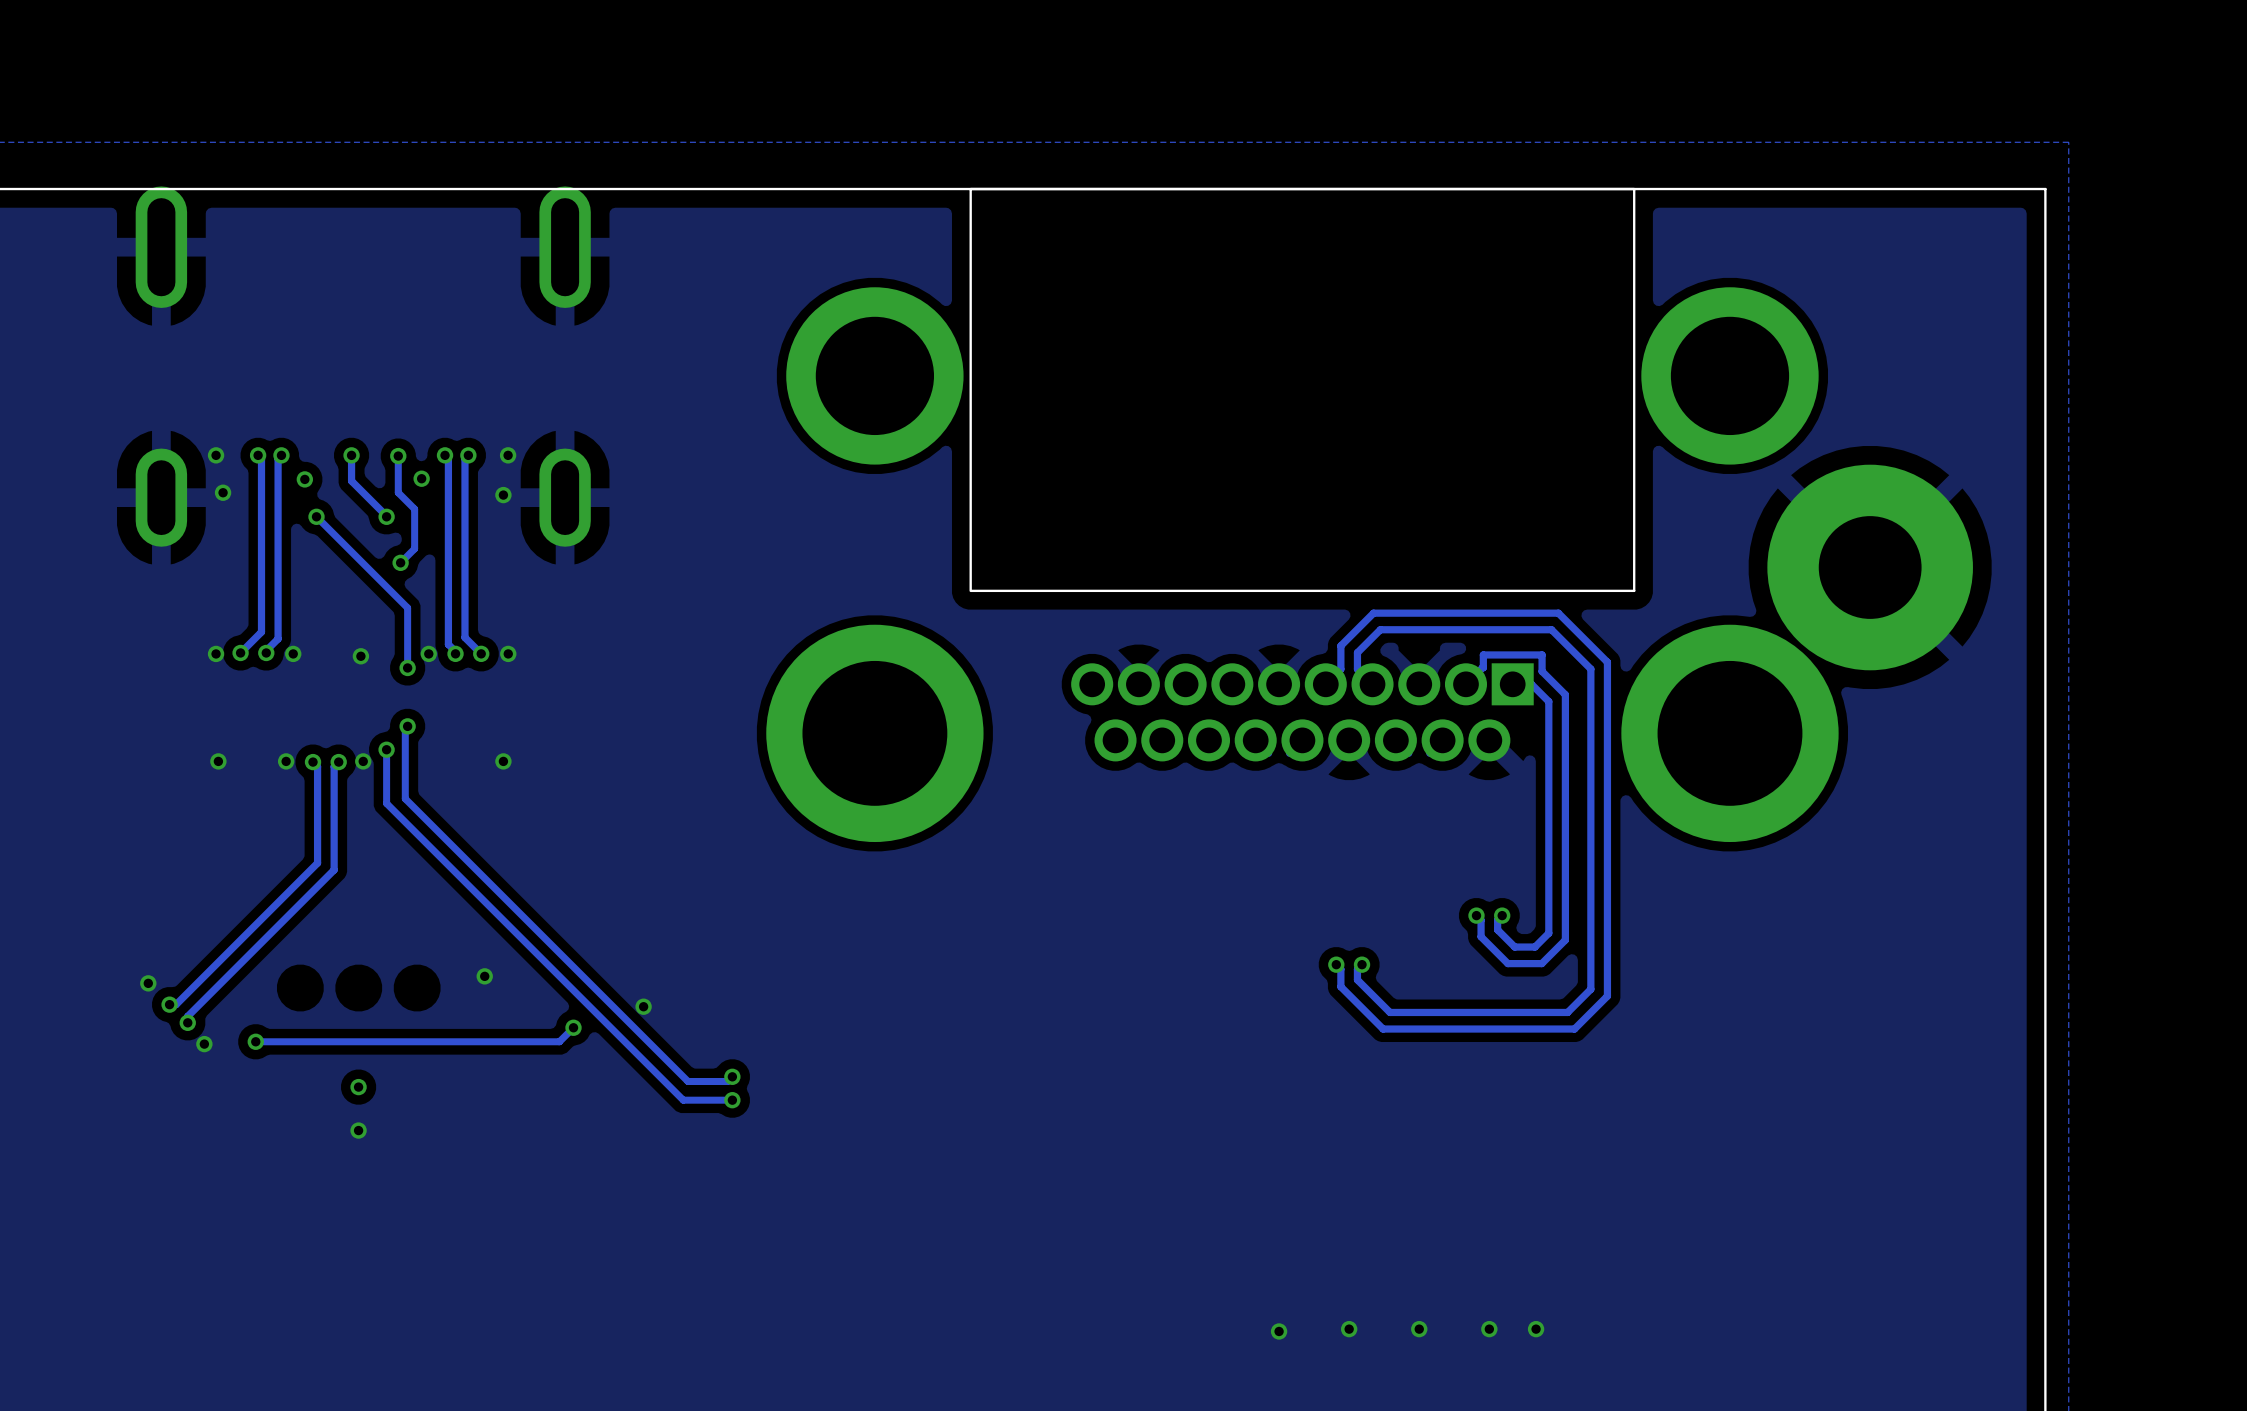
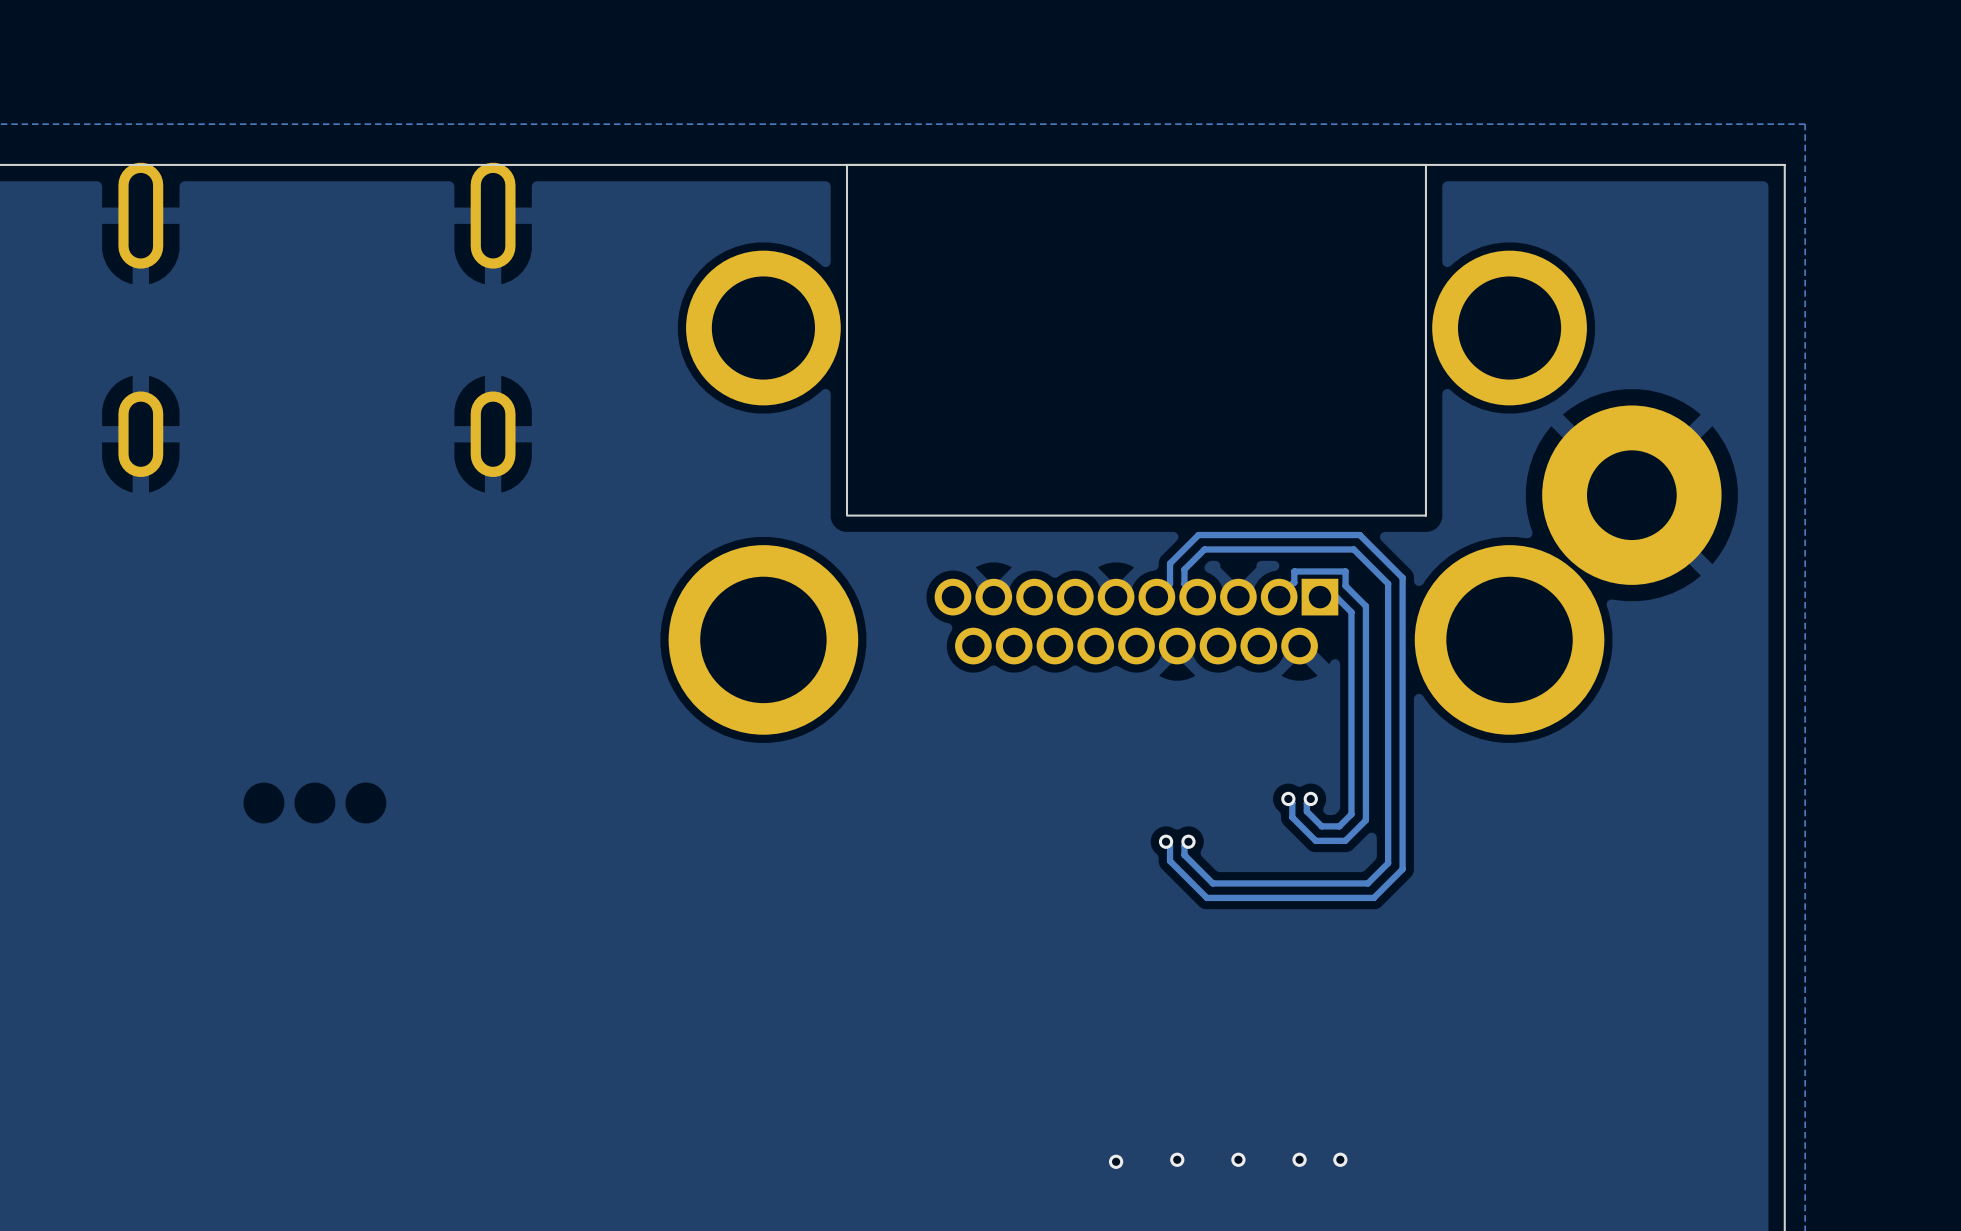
via: (216, 455) -> none
track: (258, 455) (261, 458) (261, 632) (240, 652) -> none
via: (258, 455) -> none
track: (281, 455) (278, 458) (278, 638) (266, 652) -> none
via: (281, 455) -> none
track: (351, 455) (351, 481) (386, 516) -> none
via: (351, 455) -> none
track: (445, 455) (448, 458) (448, 644) (455, 653) -> none
via: (445, 455) -> none
track: (468, 455) (464, 458) (464, 637) (481, 653) -> none
via: (468, 455) -> none
via: (508, 455) -> none
track: (398, 456) (398, 492) (414, 509) (414, 548) (400, 562) -> none
via: (398, 456) -> none
via: (421, 478) -> none
via: (304, 479) -> none
via: (223, 492) -> none
via: (503, 495) -> none
track: (316, 516) (407, 607) (407, 667) -> none
via: (316, 516) -> none
via: (386, 516) -> none
via: (400, 562) -> none
via: (240, 652) -> none
via: (266, 652) -> none
via: (216, 653) -> none
via: (293, 653) -> none
via: (428, 653) -> none
via: (455, 653) -> none
via: (481, 653) -> none
via: (508, 653) -> none
via: (360, 656) -> none
via: (407, 667) -> none
track: (407, 726) (405, 728) (405, 798) (687, 1081) (727, 1081) (732, 1076) -> none
via: (407, 726) -> none
track: (386, 749) (386, 803) (683, 1100) (732, 1100) -> none
via: (386, 749) -> none
via: (218, 761) -> none
via: (286, 761) -> none
via: (363, 761) -> none
via: (503, 761) -> none
track: (313, 762) (317, 766) (317, 863) (176, 1004) (169, 1004) -> none
via: (313, 762) -> none
track: (338, 762) (334, 766) (334, 869) (187, 1016) (187, 1022) -> none
via: (338, 762) -> none
via: (484, 976) -> none
via: (148, 983) -> none
via: (169, 1004) -> none
via: (643, 1006) -> none
via: (187, 1022) -> none
track: (573, 1027) (559, 1041) (255, 1041) -> none
via: (573, 1027) -> none
via: (255, 1041) -> none
via: (204, 1044) -> none
via: (732, 1076) -> none
via: (358, 1087) -> none
via: (732, 1100) -> none
via: (358, 1130) -> none

